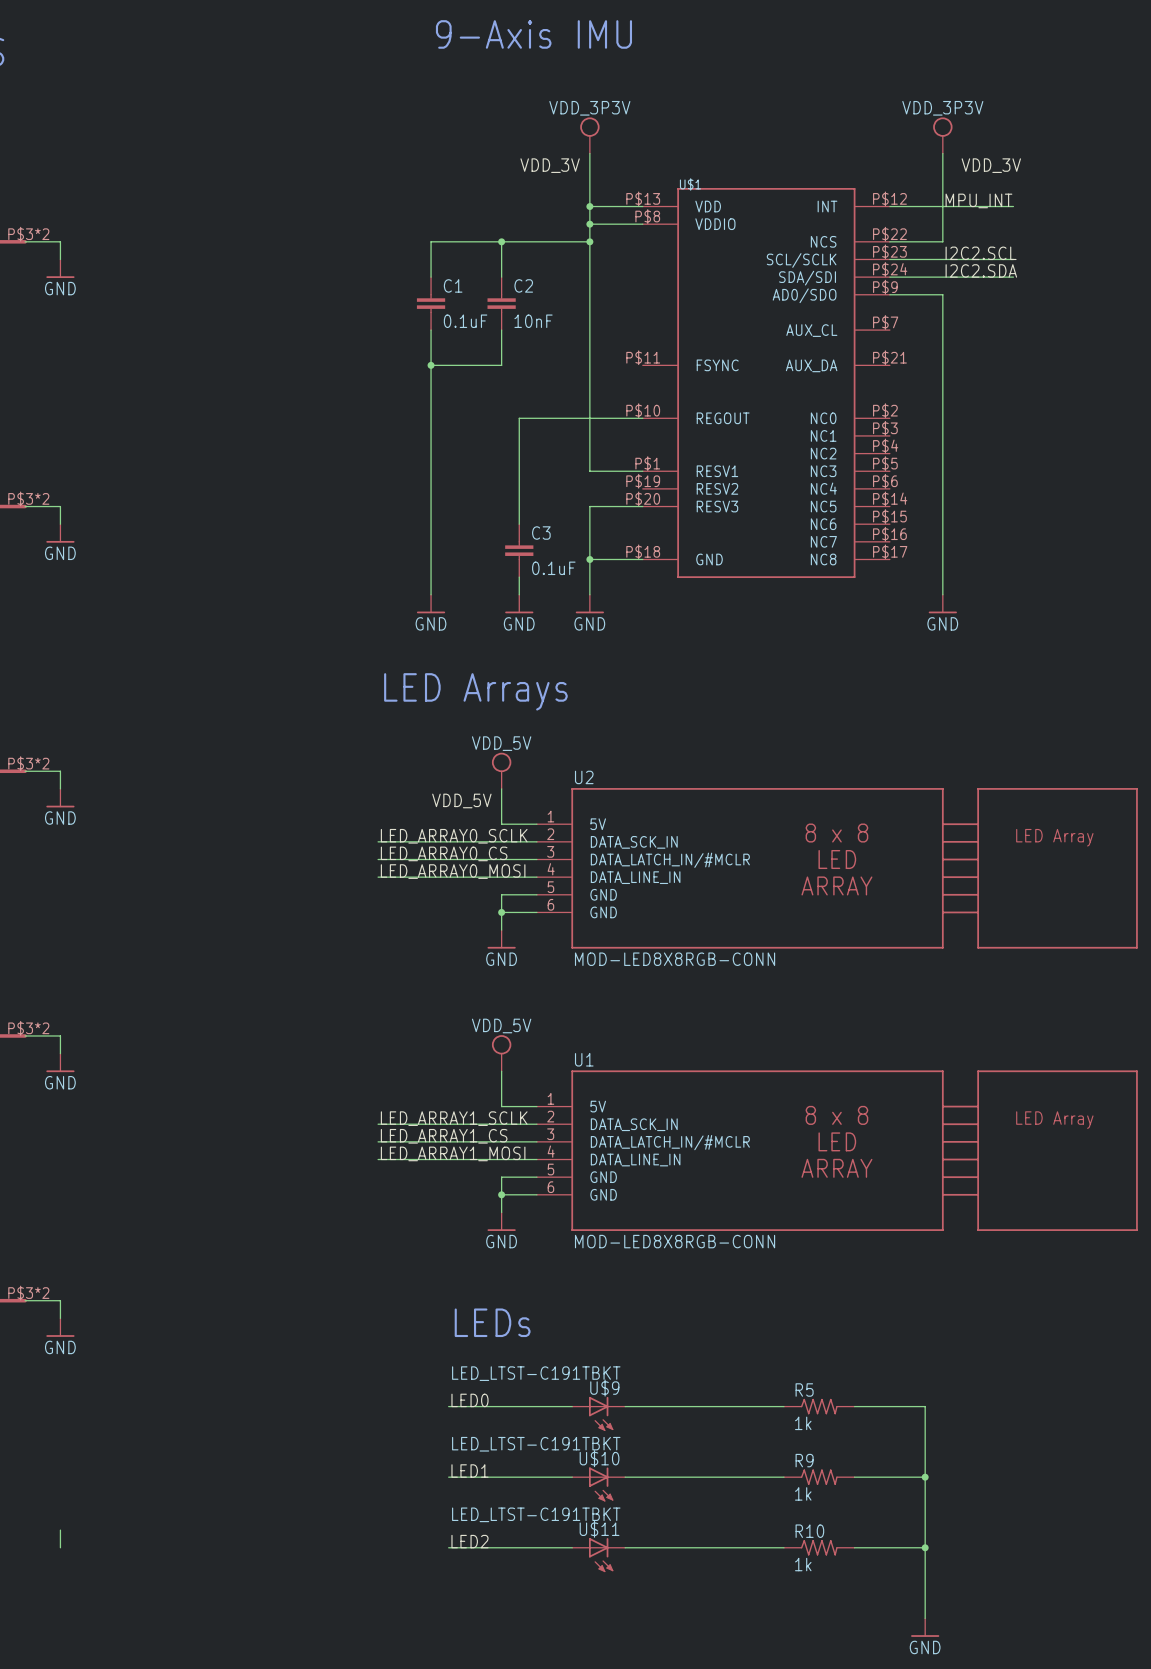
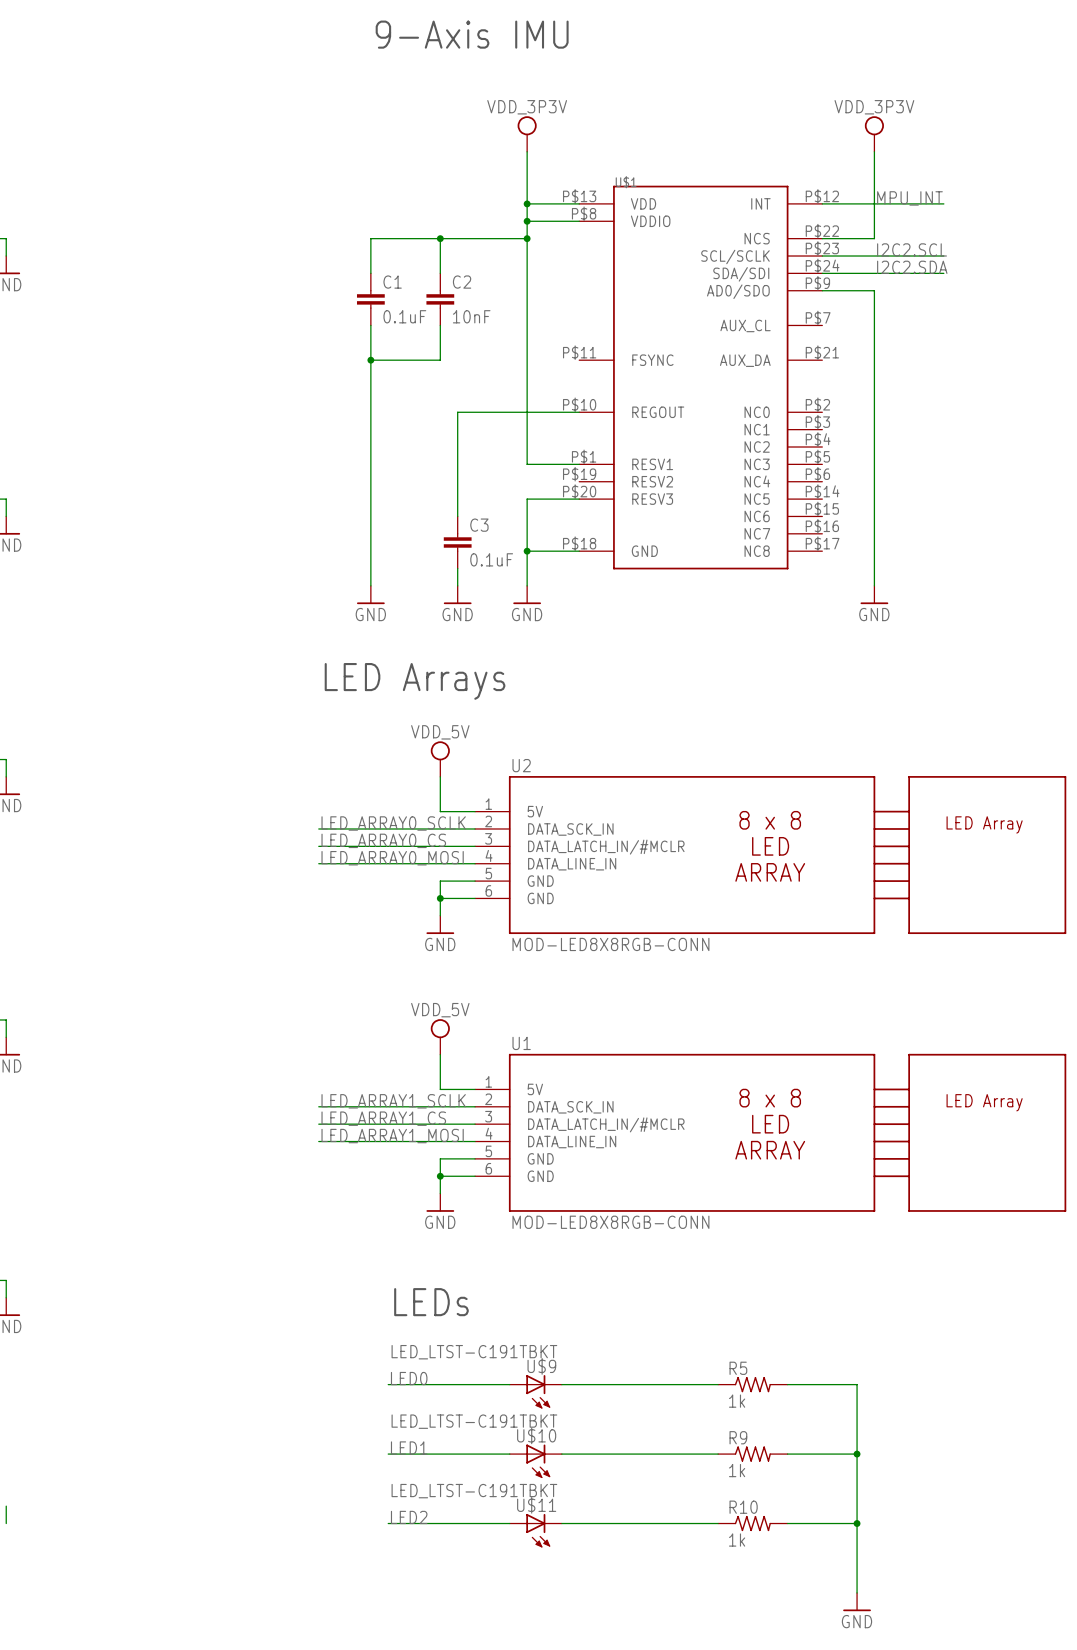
label: VDD_3V (550, 165) -> none
label: VDD_3V (991, 165) -> none
label: VDD_5V (461, 800) -> none

